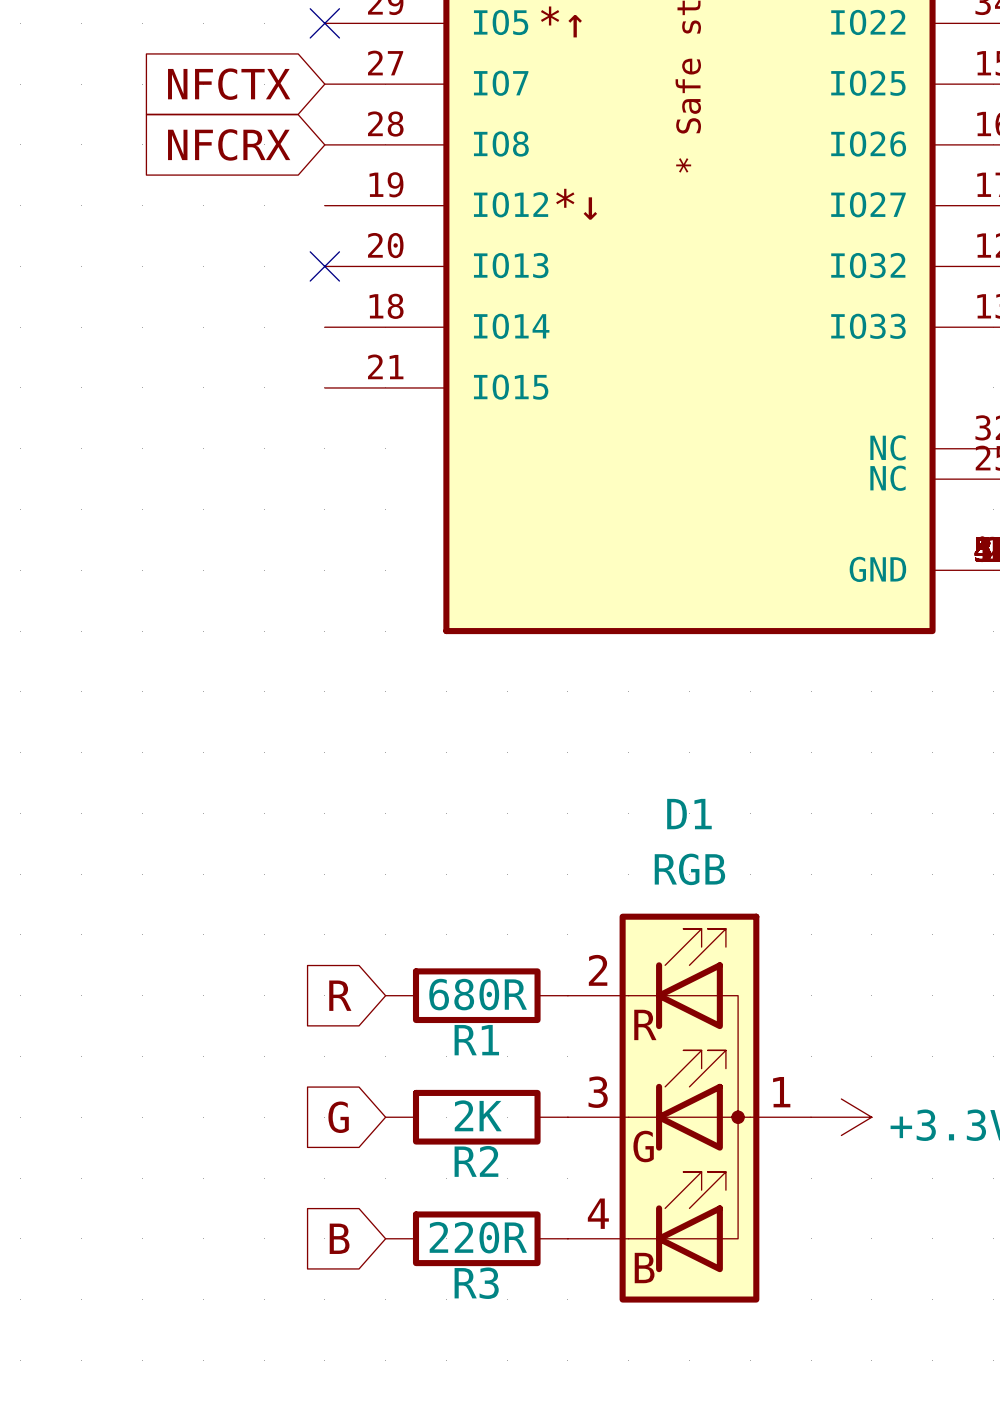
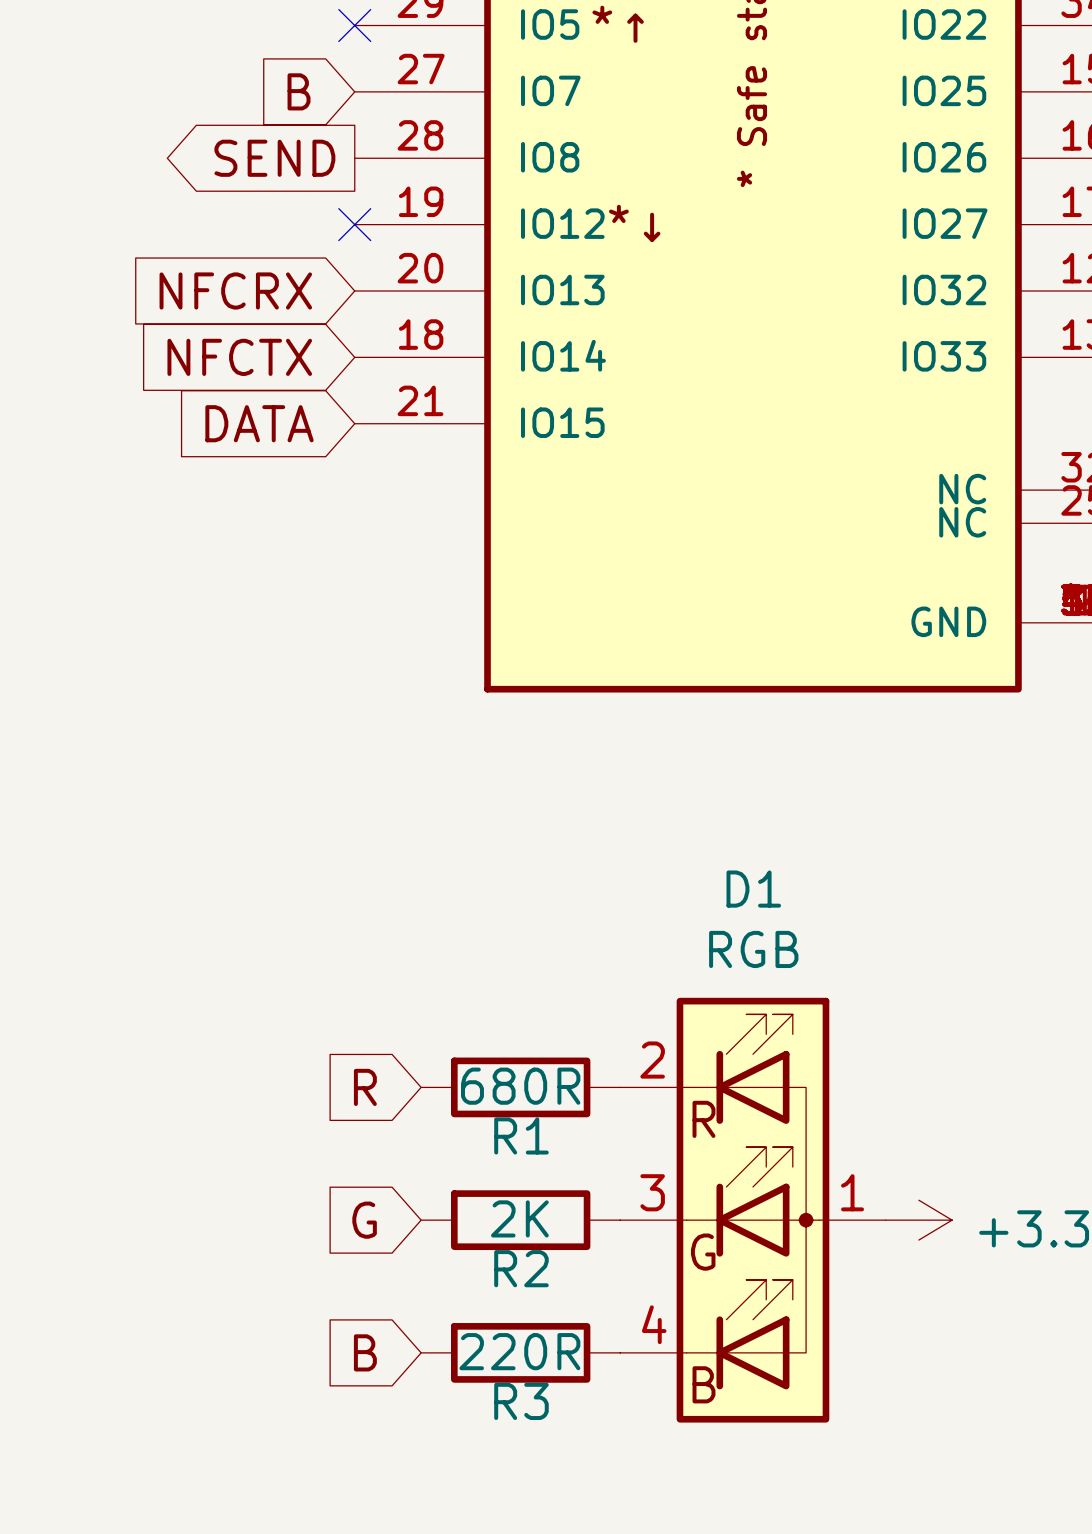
global label: NFCTX (229, 84) -> B (299, 91)
global label shape: input (229, 144) -> output (274, 158)
global label: NFCRX (229, 144) -> SEND (274, 158)
global label: none -> NFCRX (235, 290)
no-connect mark position: (324, 266) -> (354, 224)
global label: none -> NFCTX (239, 357)
global label: none -> DATA (259, 423)

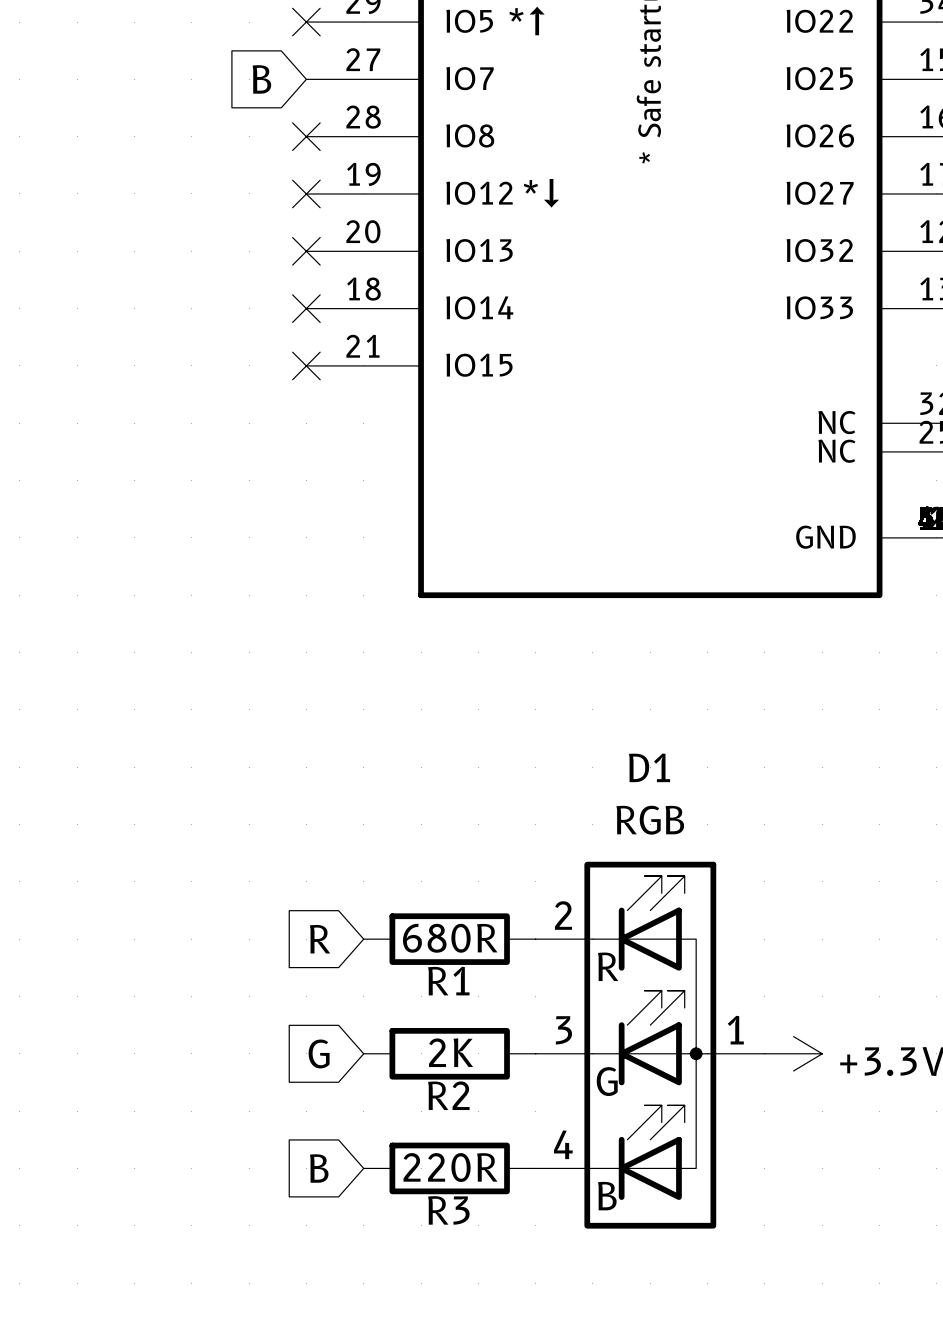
global label: SEND (274, 158) -> none
no-connect mark: none -> (306, 136)
global label: NFCRX (235, 290) -> none
no-connect mark: none -> (306, 251)
global label: NFCTX (239, 357) -> none
no-connect mark: none -> (306, 308)
global label: DATA (259, 423) -> none
no-connect mark: none -> (306, 365)

